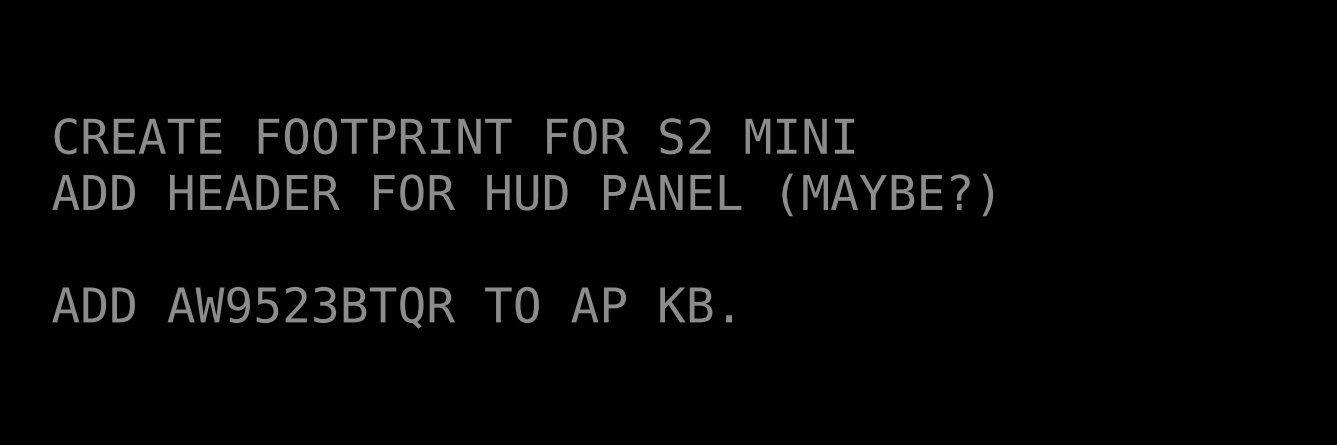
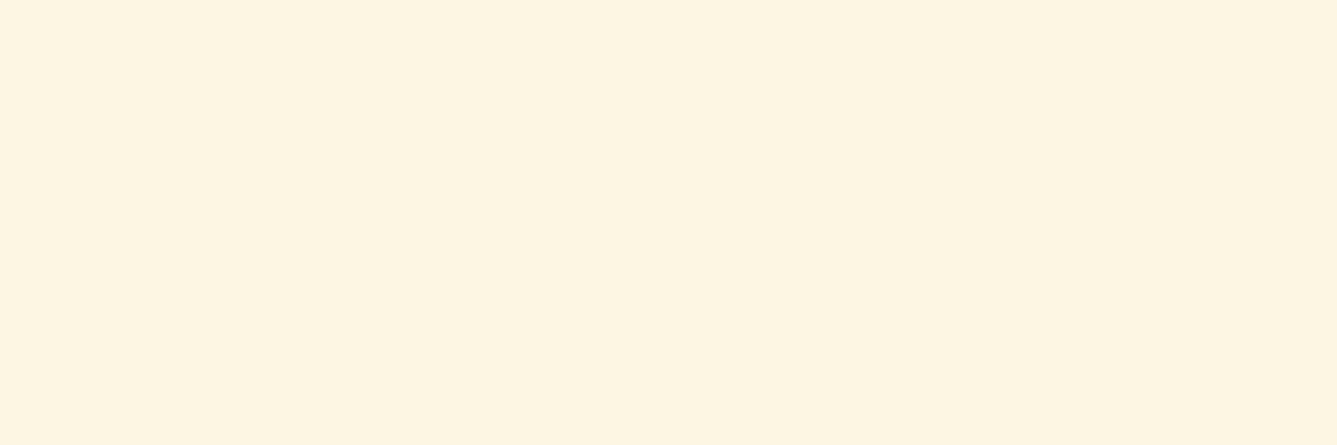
text: CREATE FOOTPRINT FOR S2 MINI (454, 136) -> none
text: ADD HEADER FOR HUD PANEL (MAYBE?) (522, 194) -> none
text: ADD AW9523BTQR TO AP KB. (392, 307) -> none

